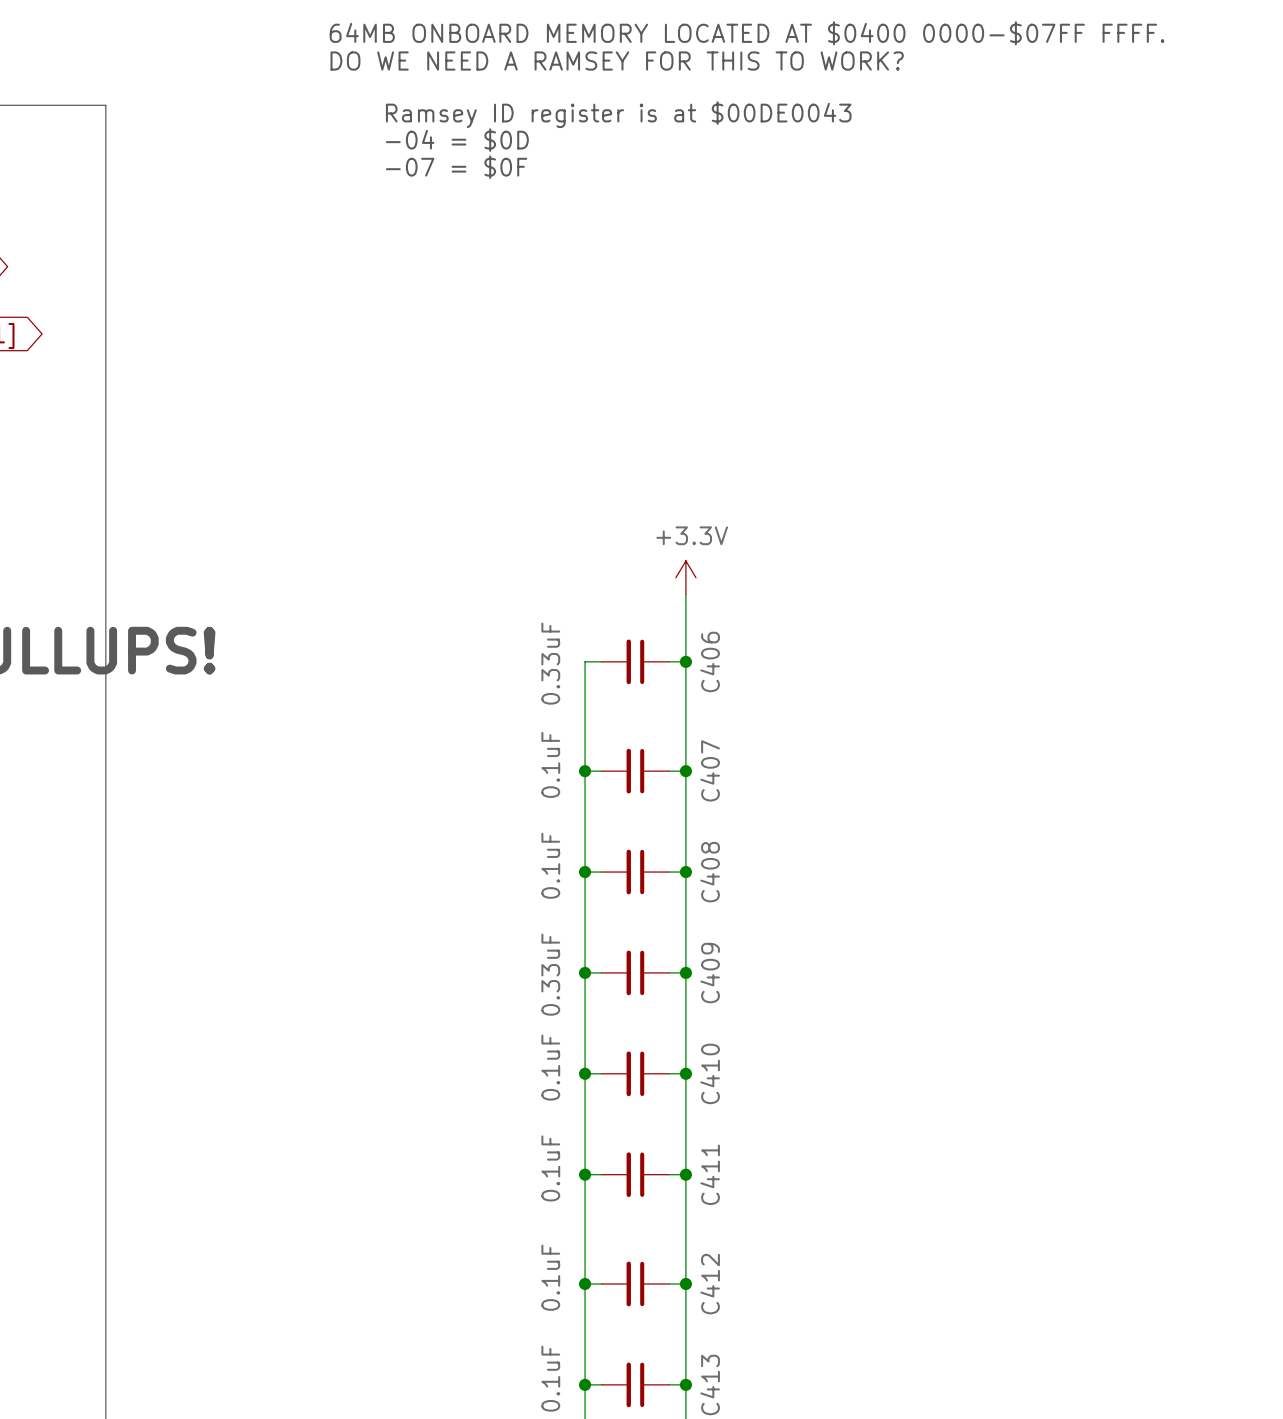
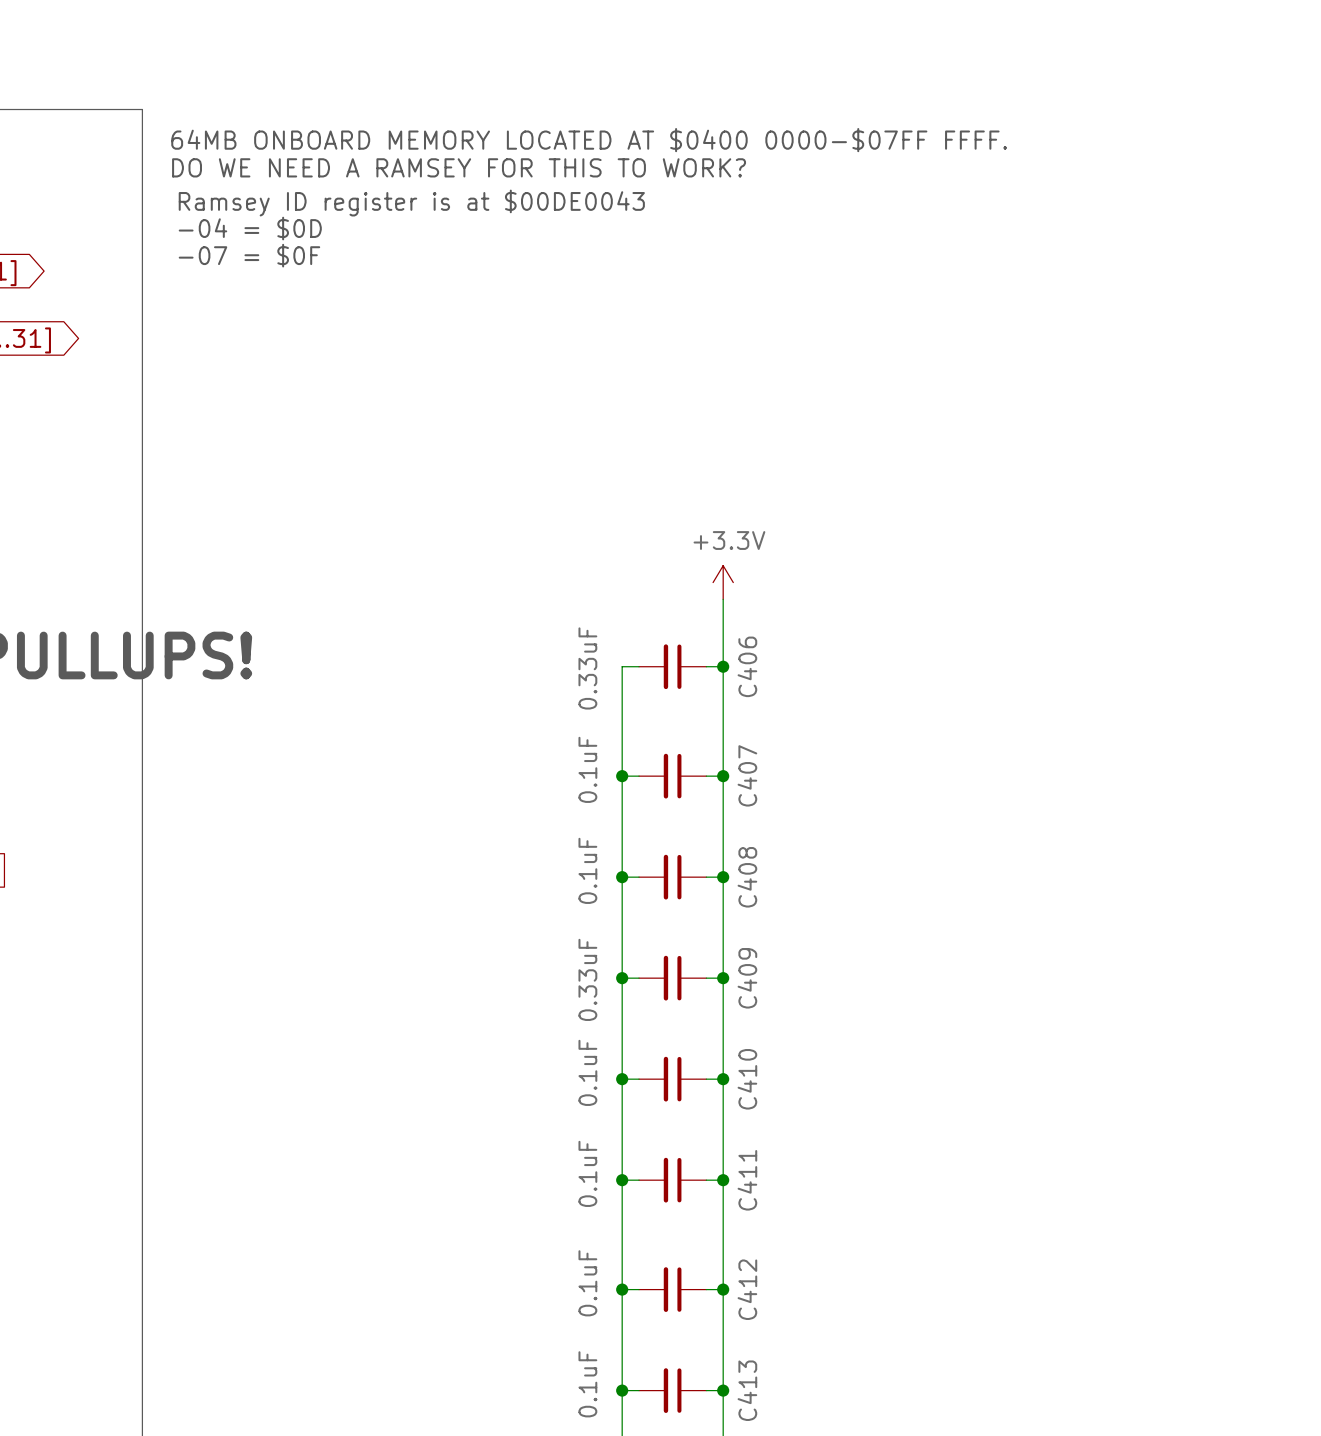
text position: 64MB ONBOARD MEMORY LOCATED AT $0400 0000-$07FF FFFF. (747, 33) -> 64MB ONBOARD MEMORY LOCATED AT $0400 0000-$07FF FFFF. (589, 140)
text position: DO WE NEED A RAMSEY FOR THIS TO WORK? (617, 61) -> DO WE NEED A RAMSEY FOR THIS TO WORK? (459, 167)
text position: Ramsey ID register is at $00DE0043 (618, 114) -> Ramsey ID register is at $00DE0043 (411, 203)
text position: -04 = $0D (457, 140) -> -04 = $0D (250, 228)
text position: -07 = $0F (456, 167) -> -07 = $0F (249, 255)

